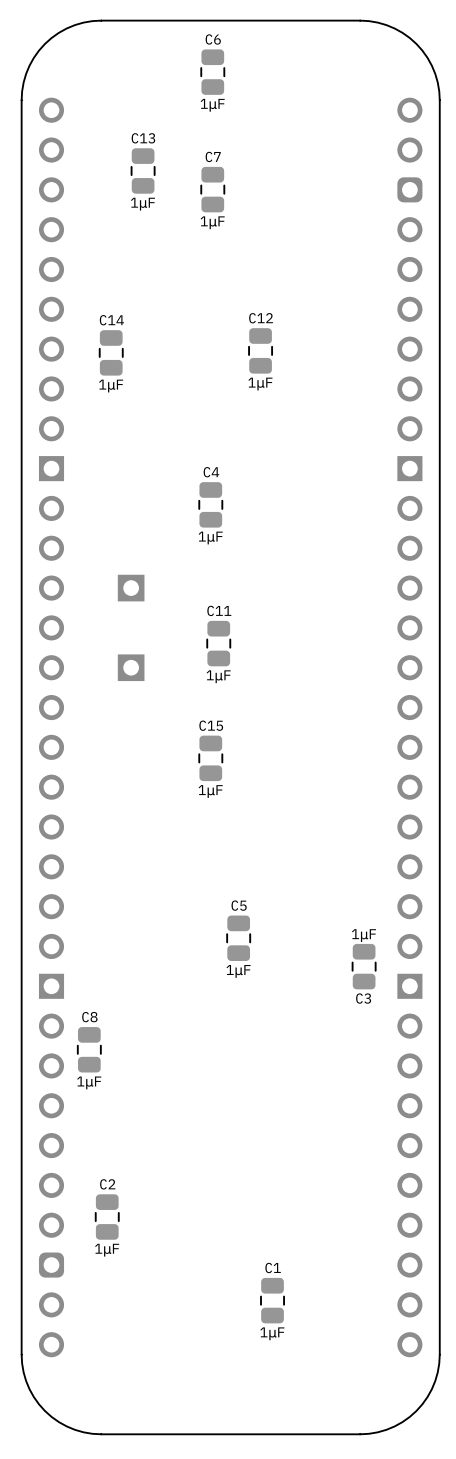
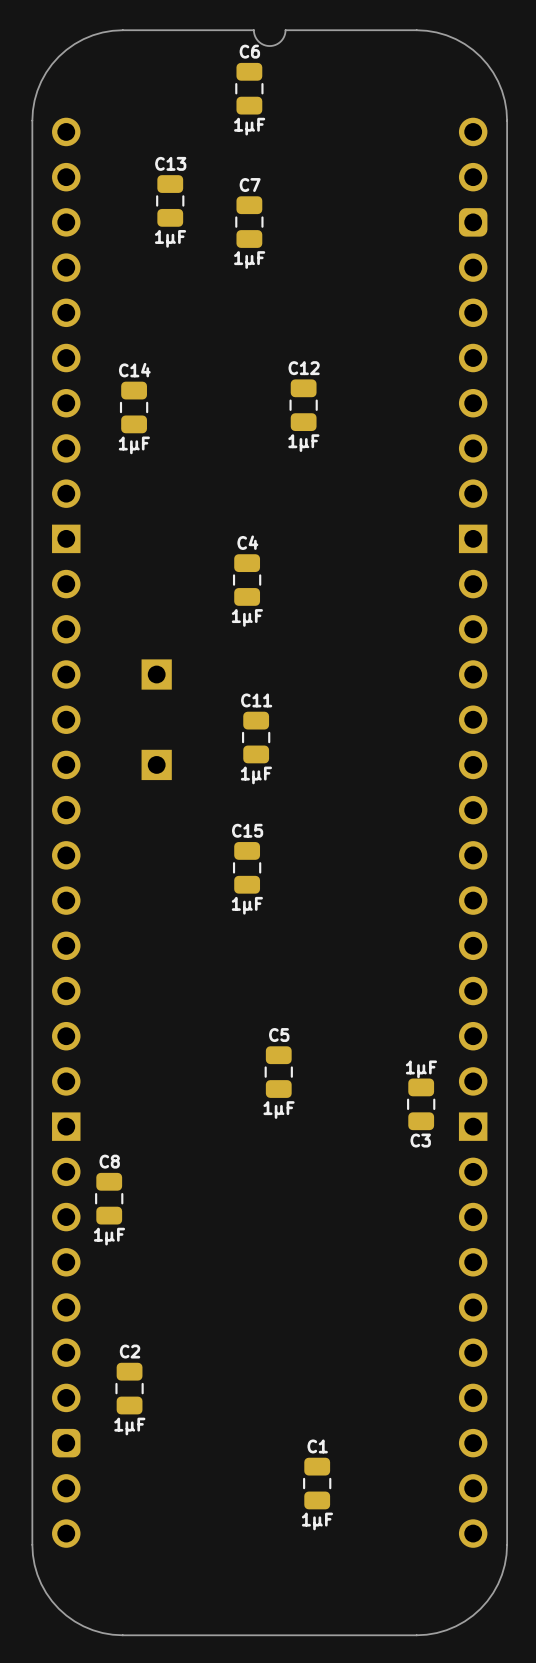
part footprint: [20, 19, 441, 1436] -> [31, 29, 508, 1637]

